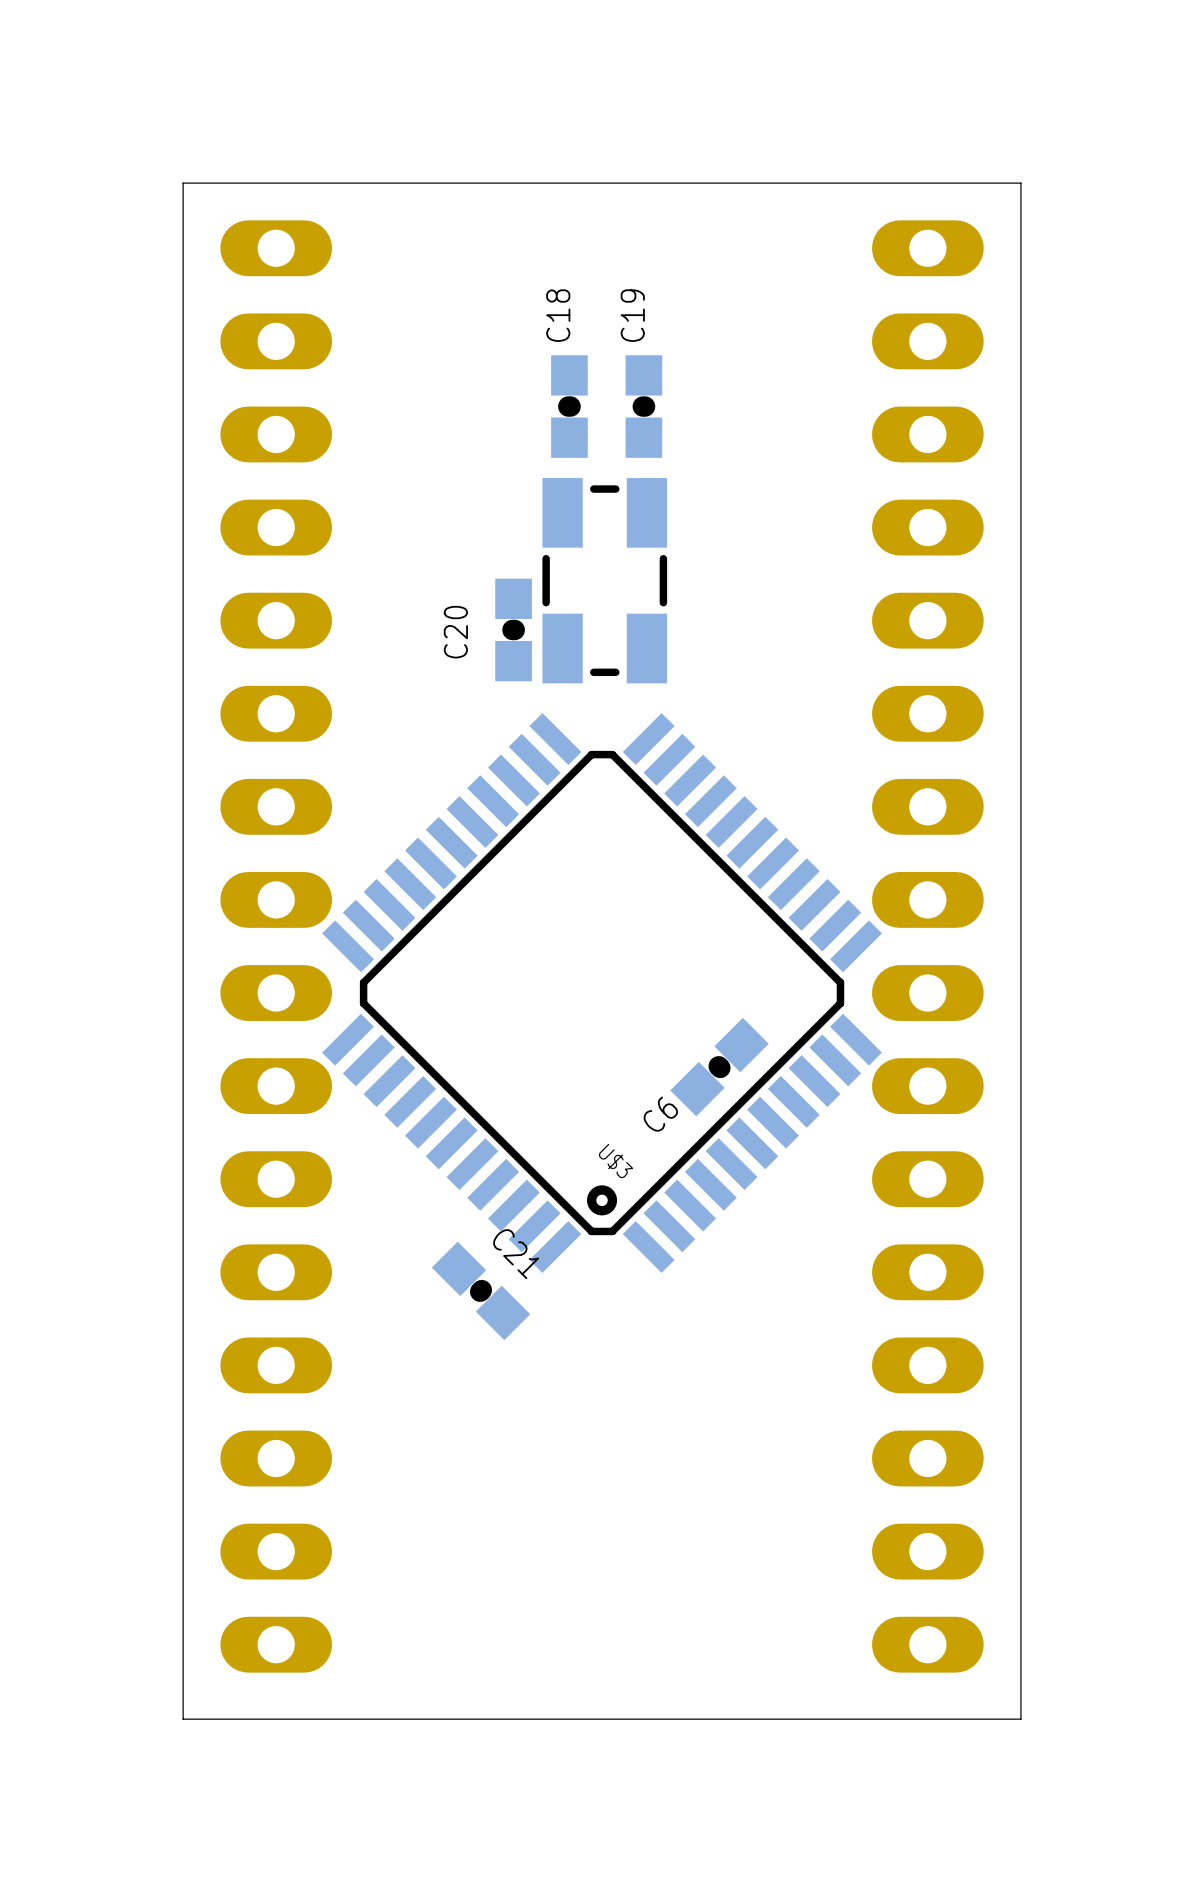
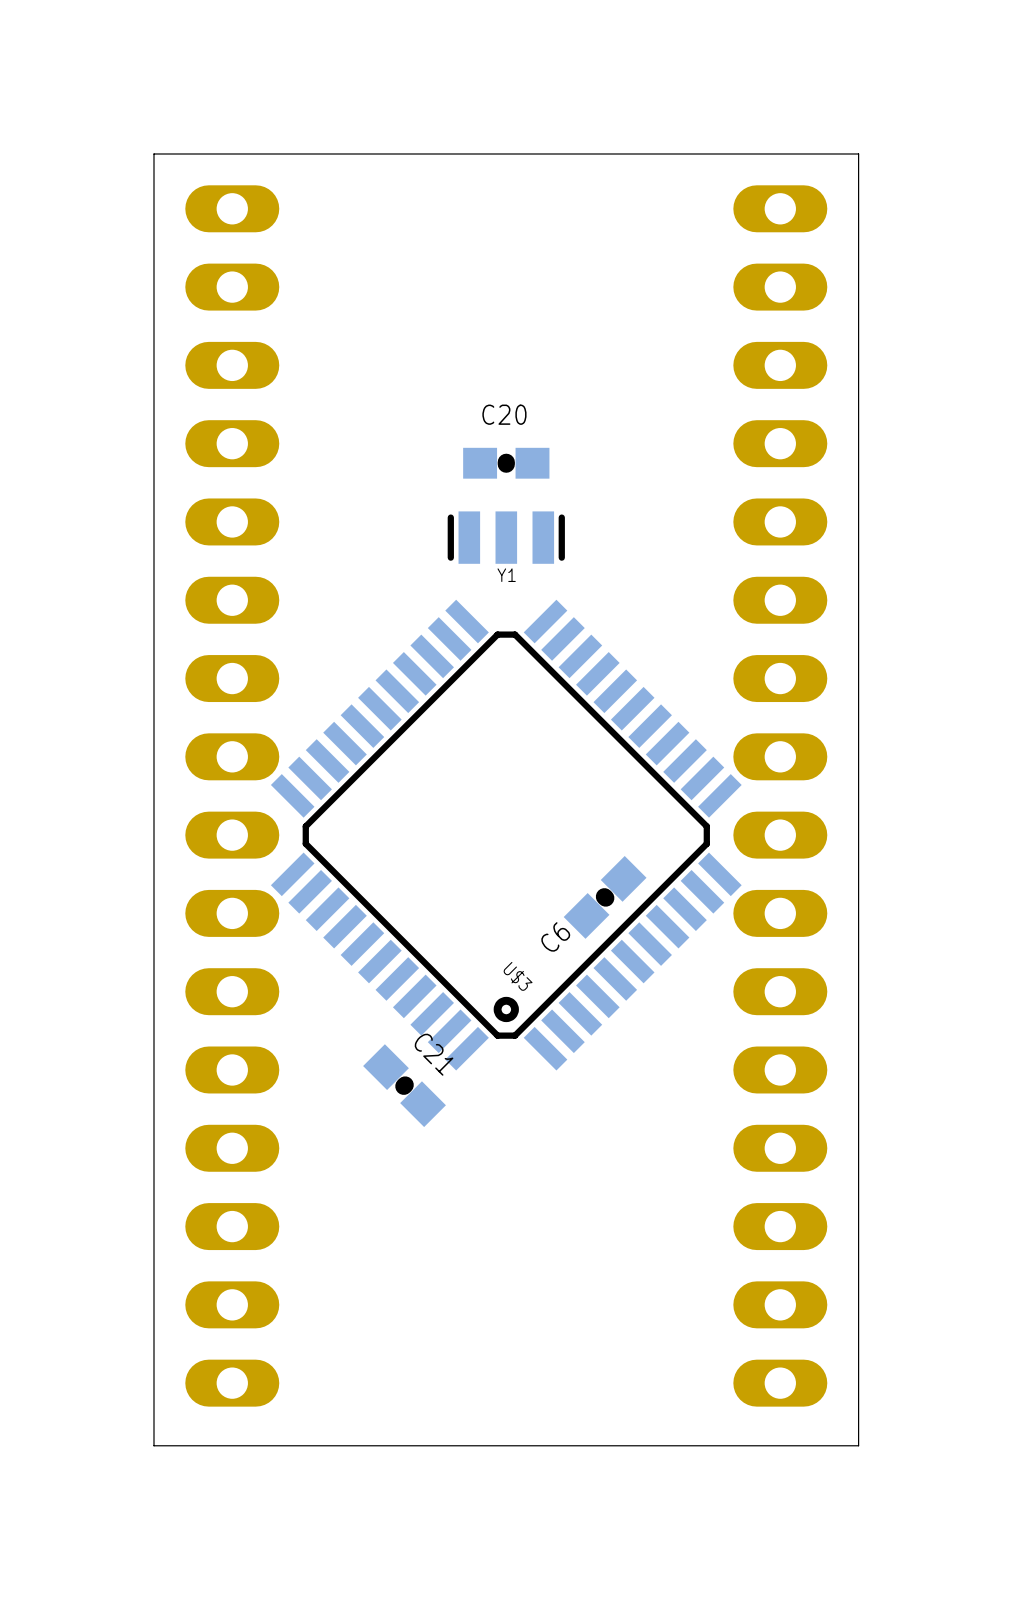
C18: (569, 406) -> none
C19: (643, 406) -> none
part: (604, 580) -> none
C20 rotation: 0° (513, 629) -> 90° clockwise (506, 463)
C20 position: (513, 629) -> (506, 463)
Y1: none -> (506, 537)

